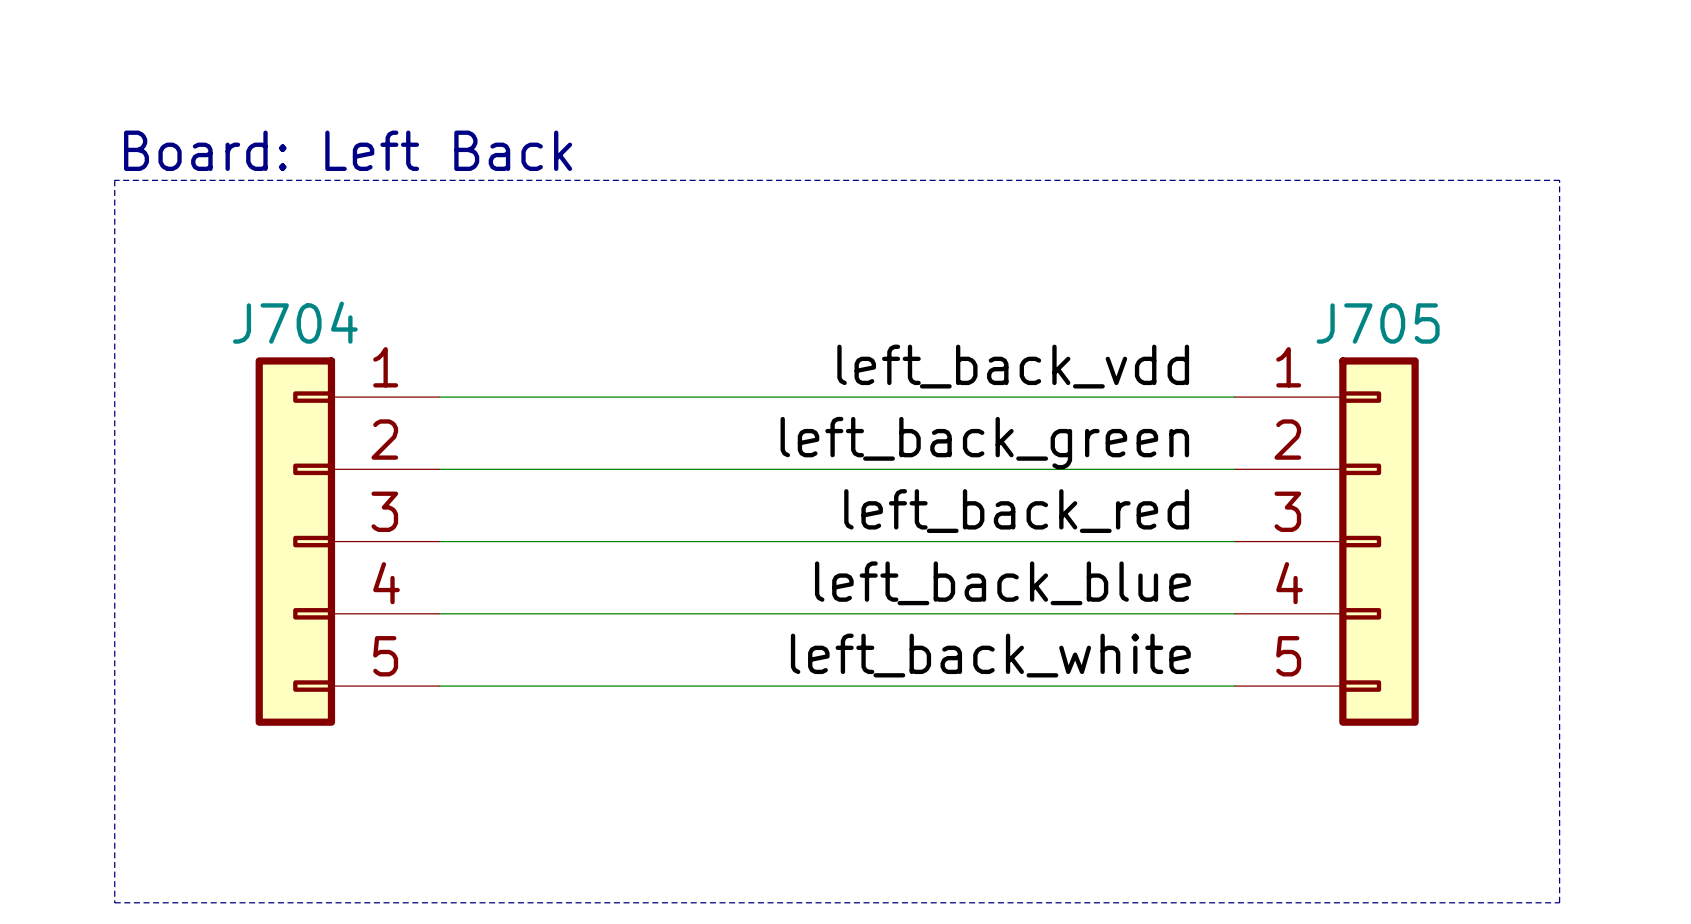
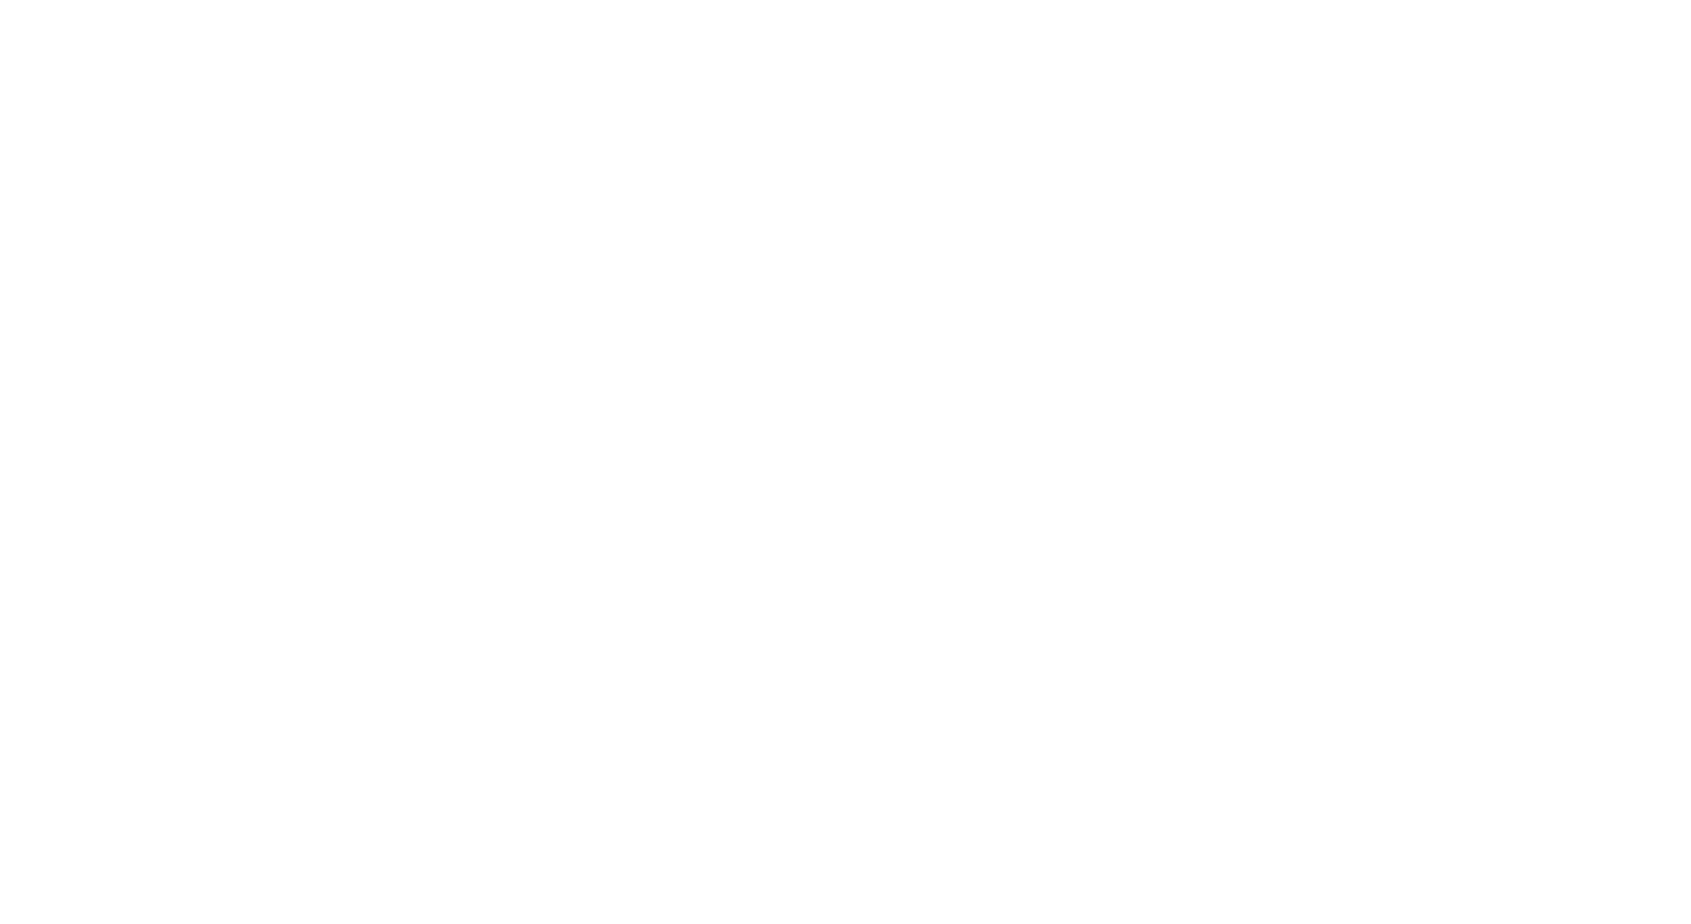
text: Board: Left Back (348, 150) -> none
line: (114, 180) (114, 902) (1559, 902) (1559, 180) (114, 180) -> none
label: left_back_vdd (1013, 366) -> none
wire: (439, 397) (1234, 397) -> none
label: left_back_green (984, 443) -> none
wire: (439, 469) (1234, 469) -> none
label: left_back_red (1016, 511) -> none
J704: (347, 541) -> none
wire: (439, 541) (1234, 541) -> none
J705: (1326, 541) -> none
label: left_back_blue (1002, 583) -> none
wire: (439, 613) (1234, 613) -> none
label: left_back_white (990, 655) -> none
wire: (439, 686) (1234, 686) -> none

